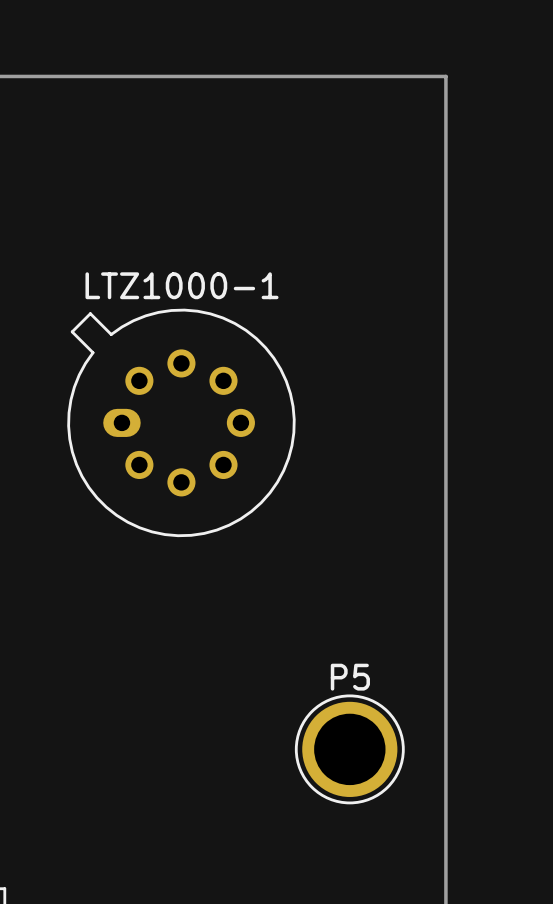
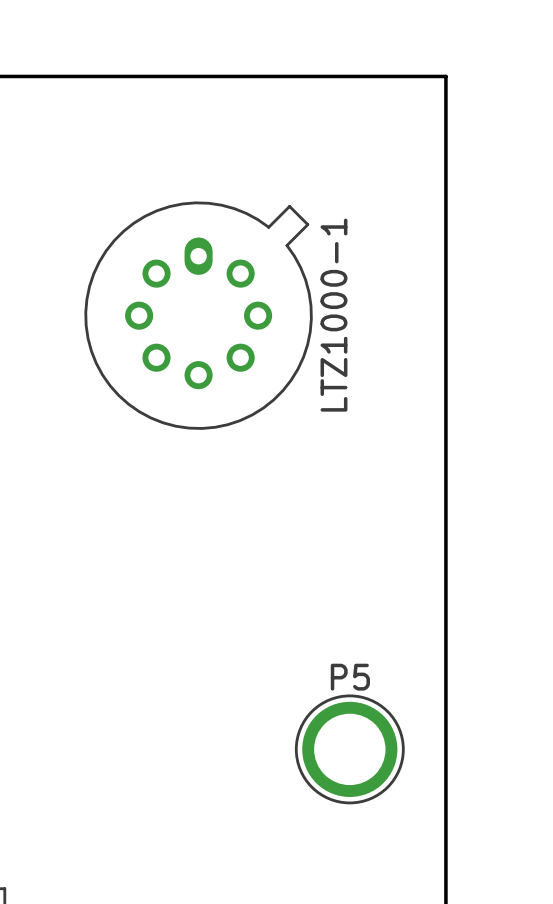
LTZ1000-1 rotation: 0° (181, 422) -> 90° clockwise (198, 315)

